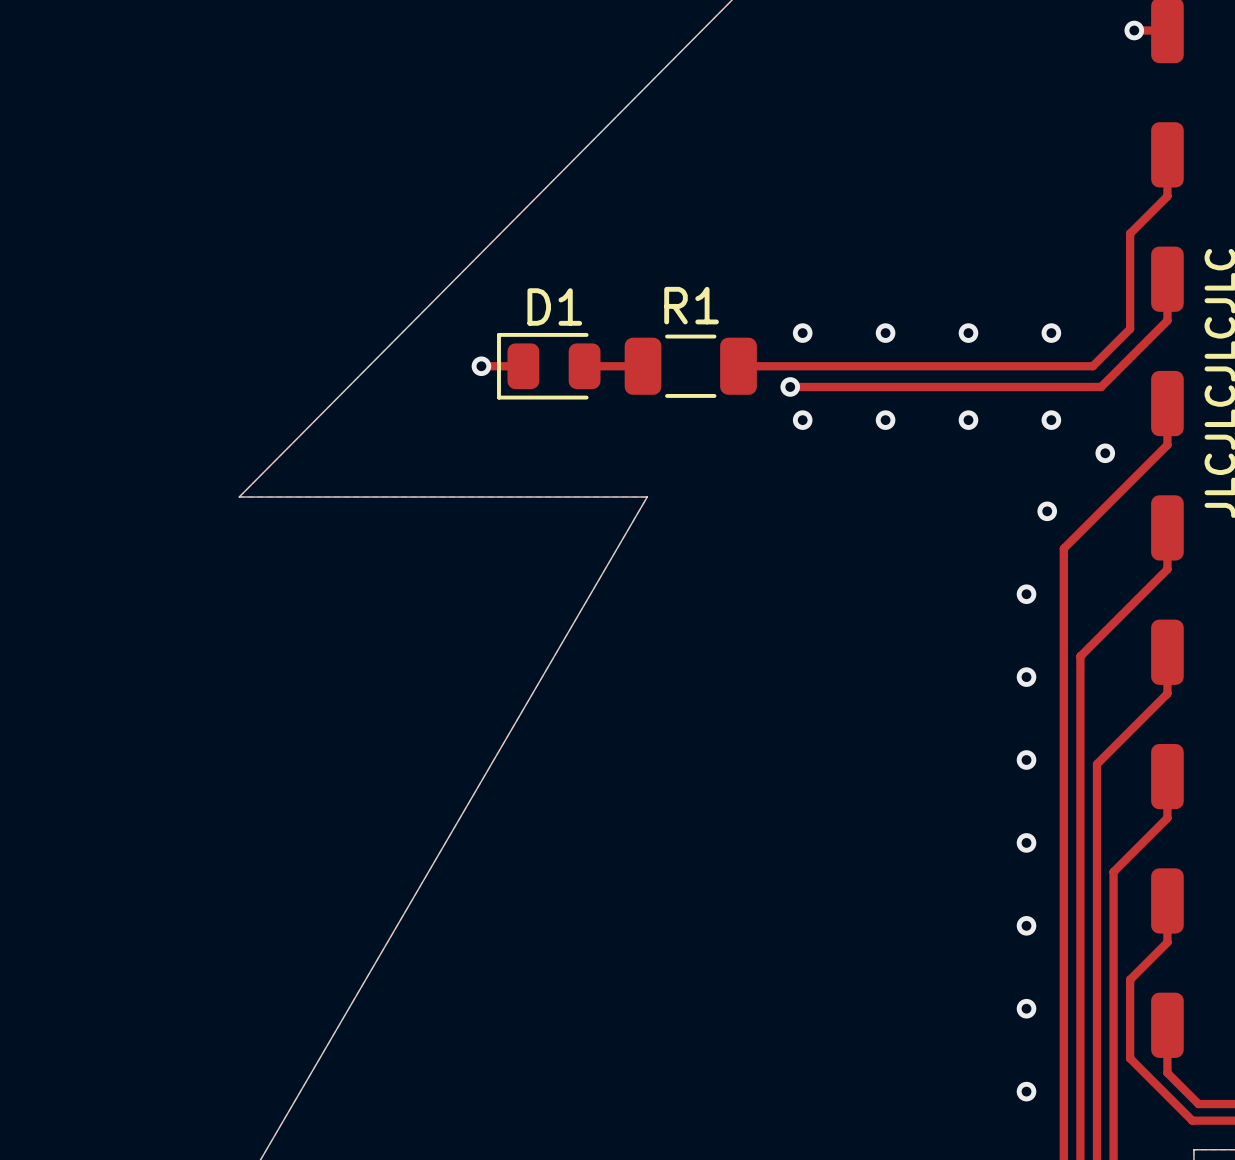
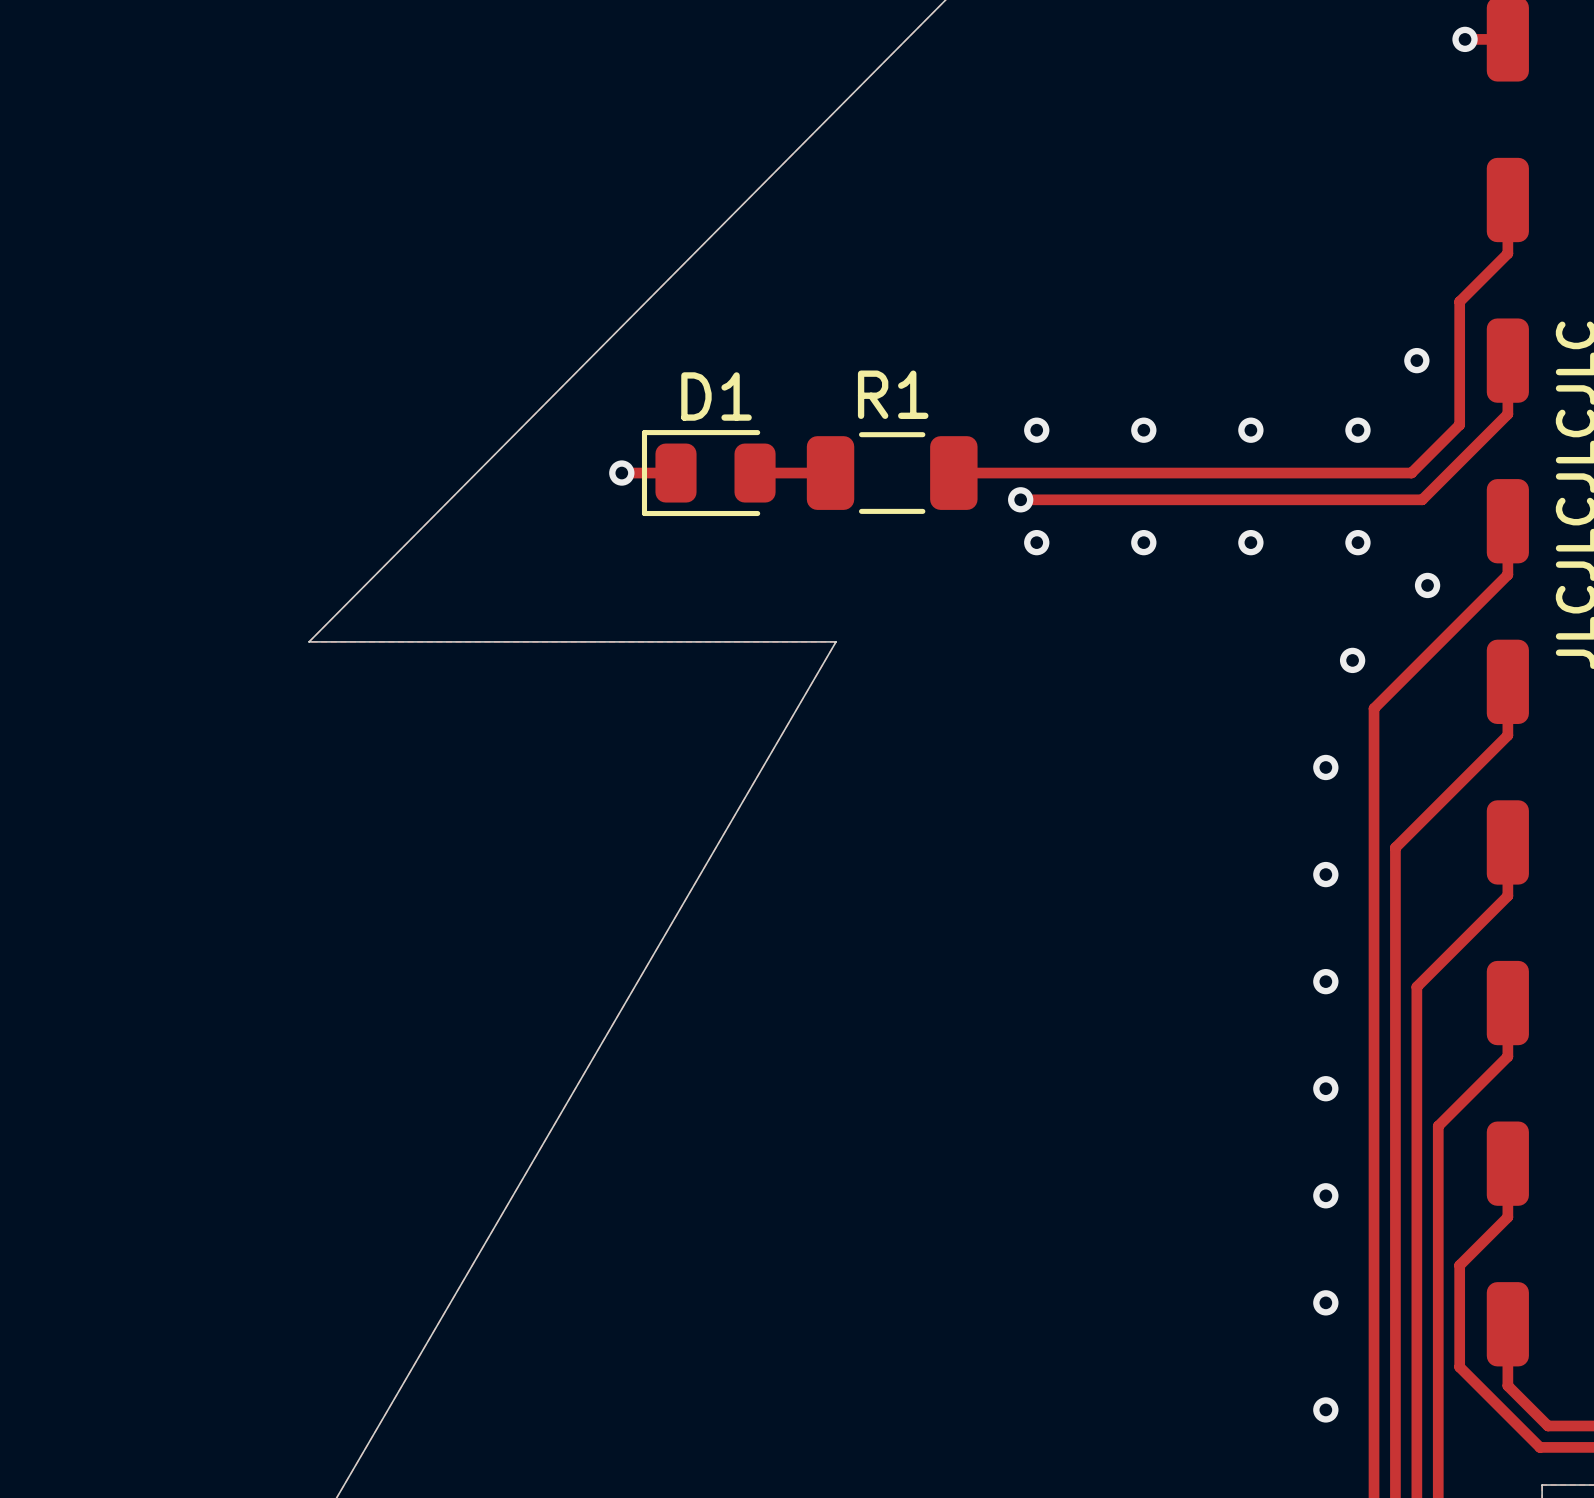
via: none -> (1416, 360)

